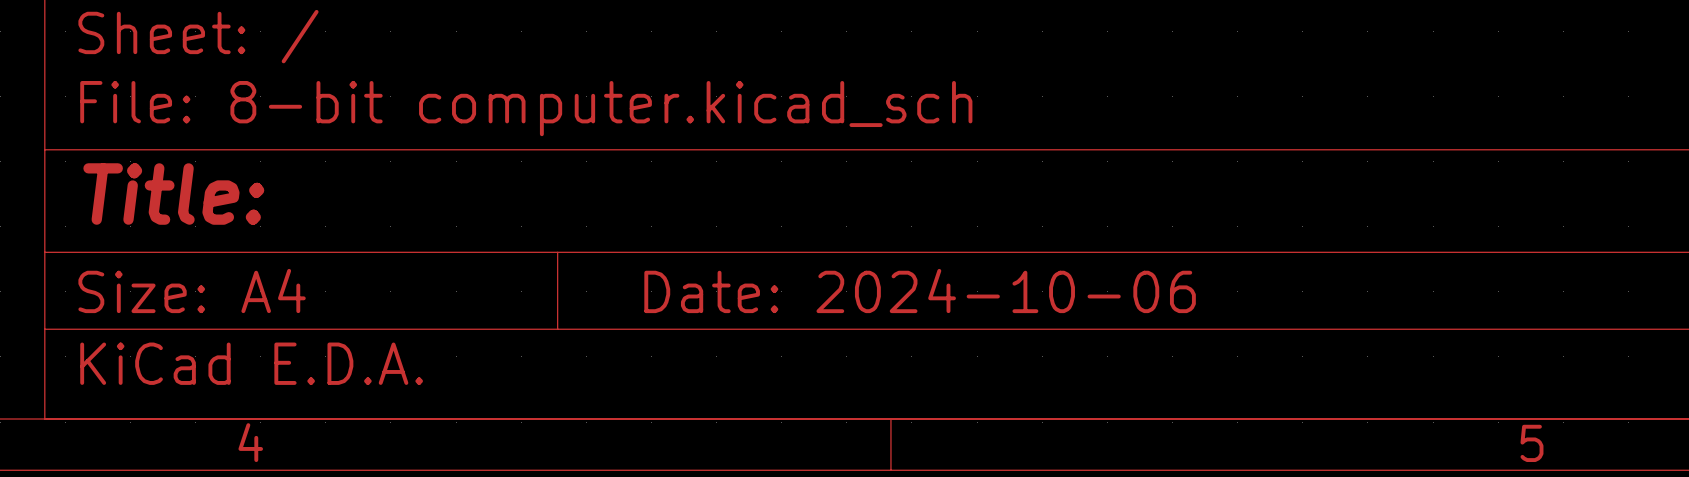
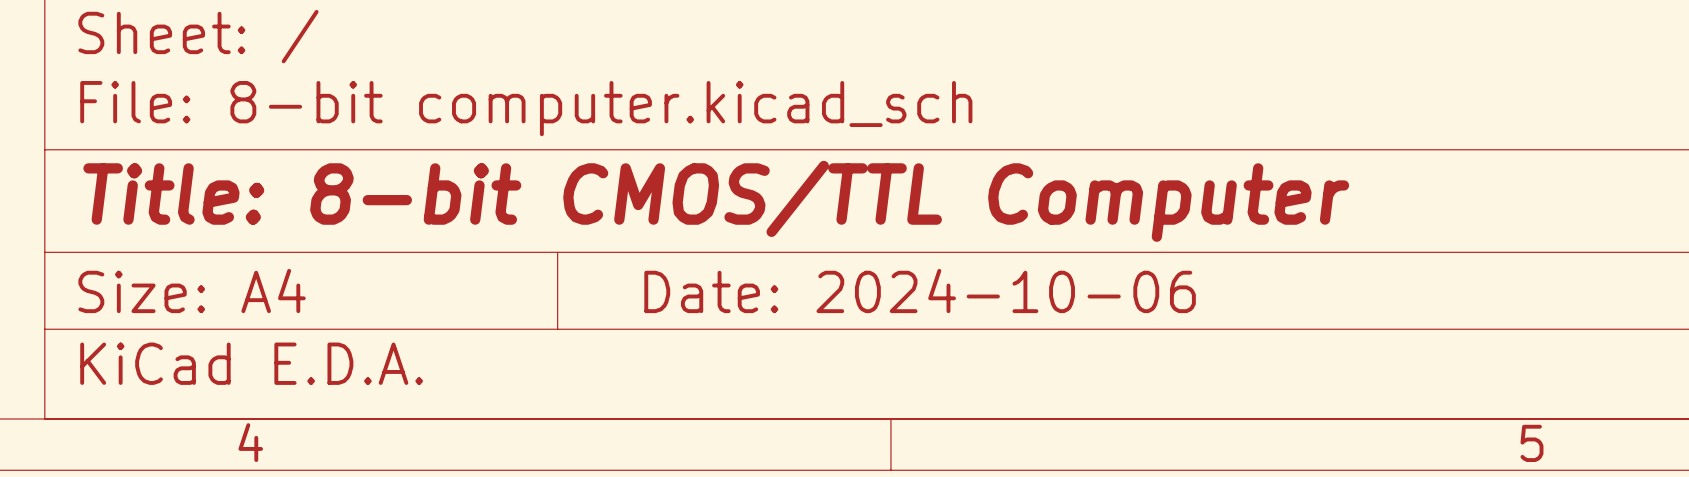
title block: Title: (173, 194) -> Title: 8-bit CMOS/TTL Computer (716, 201)

